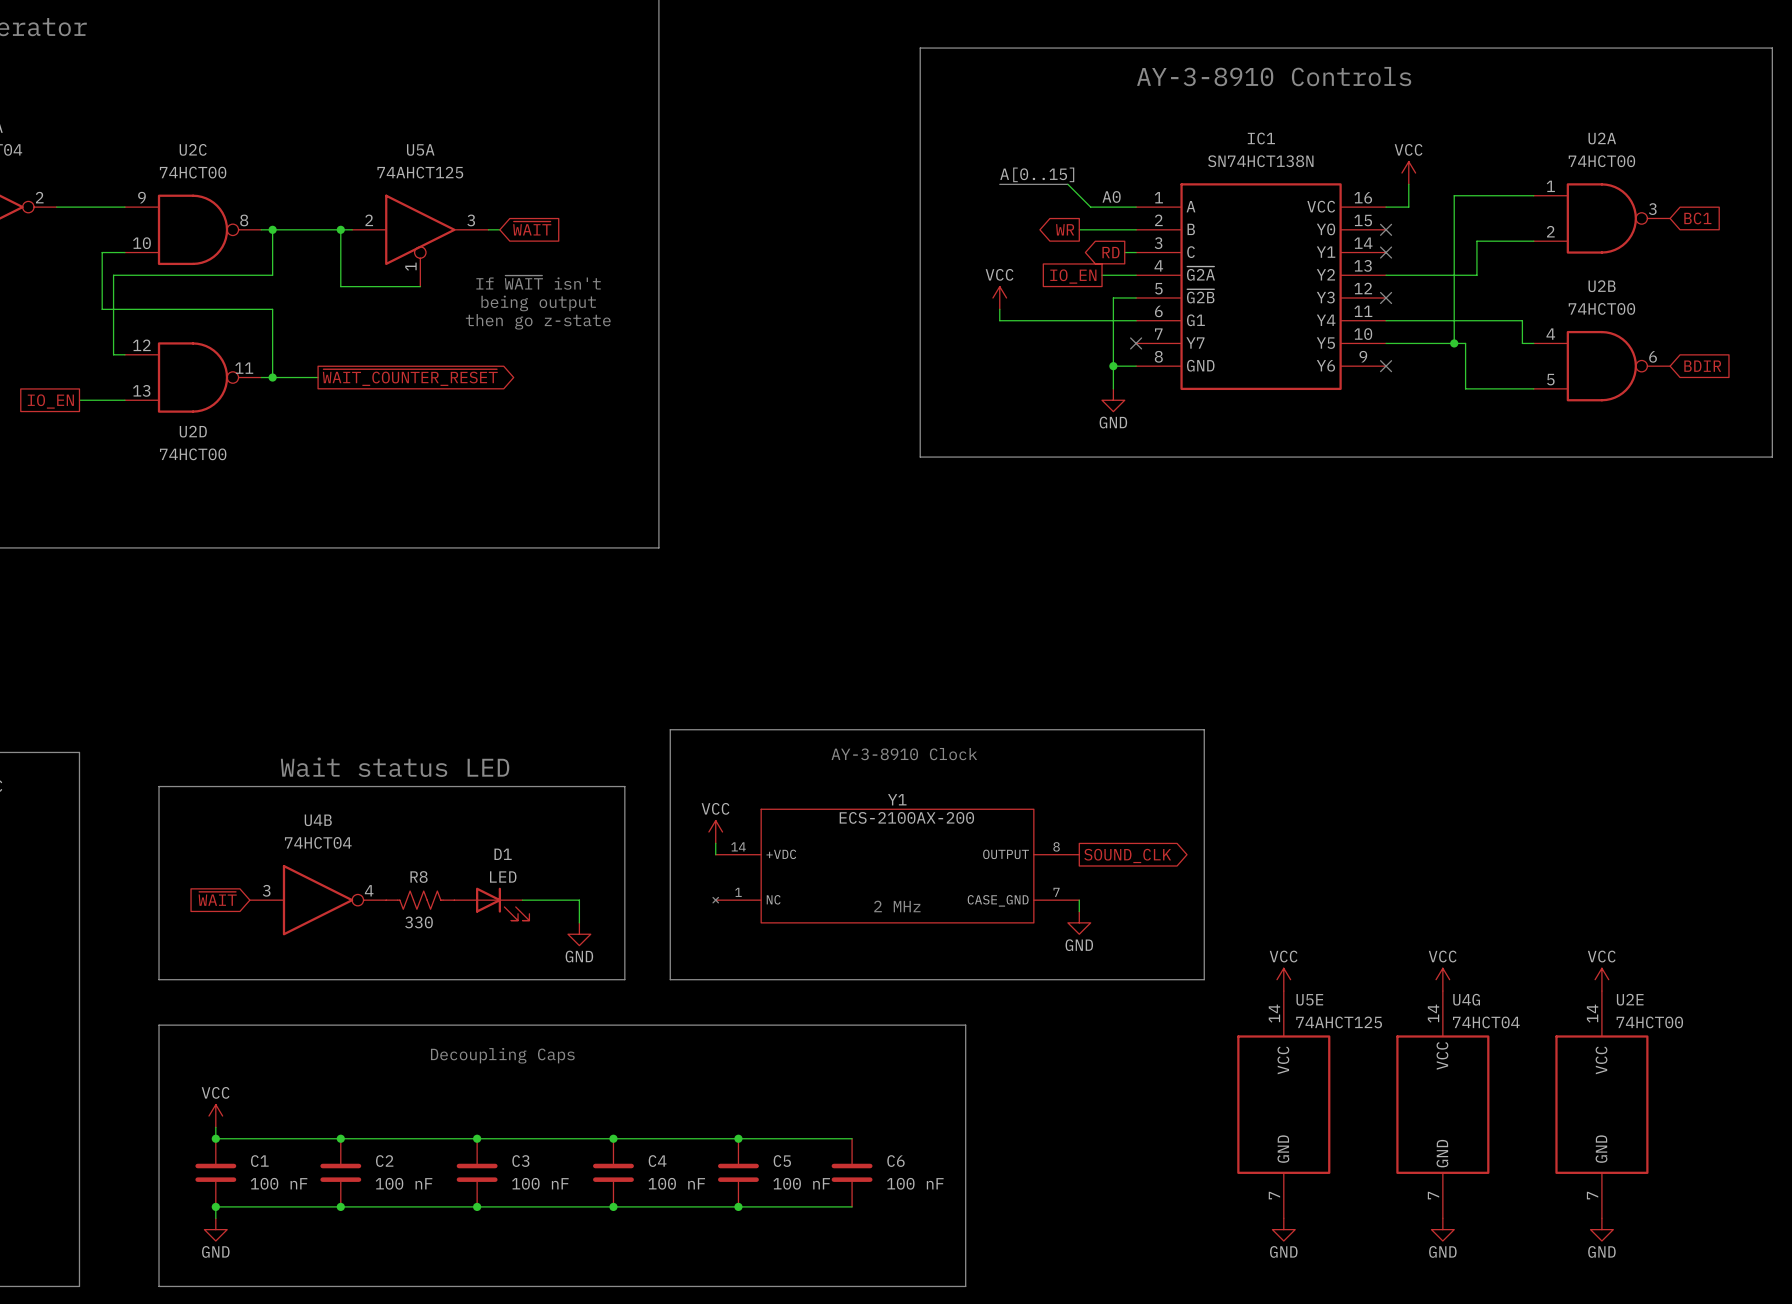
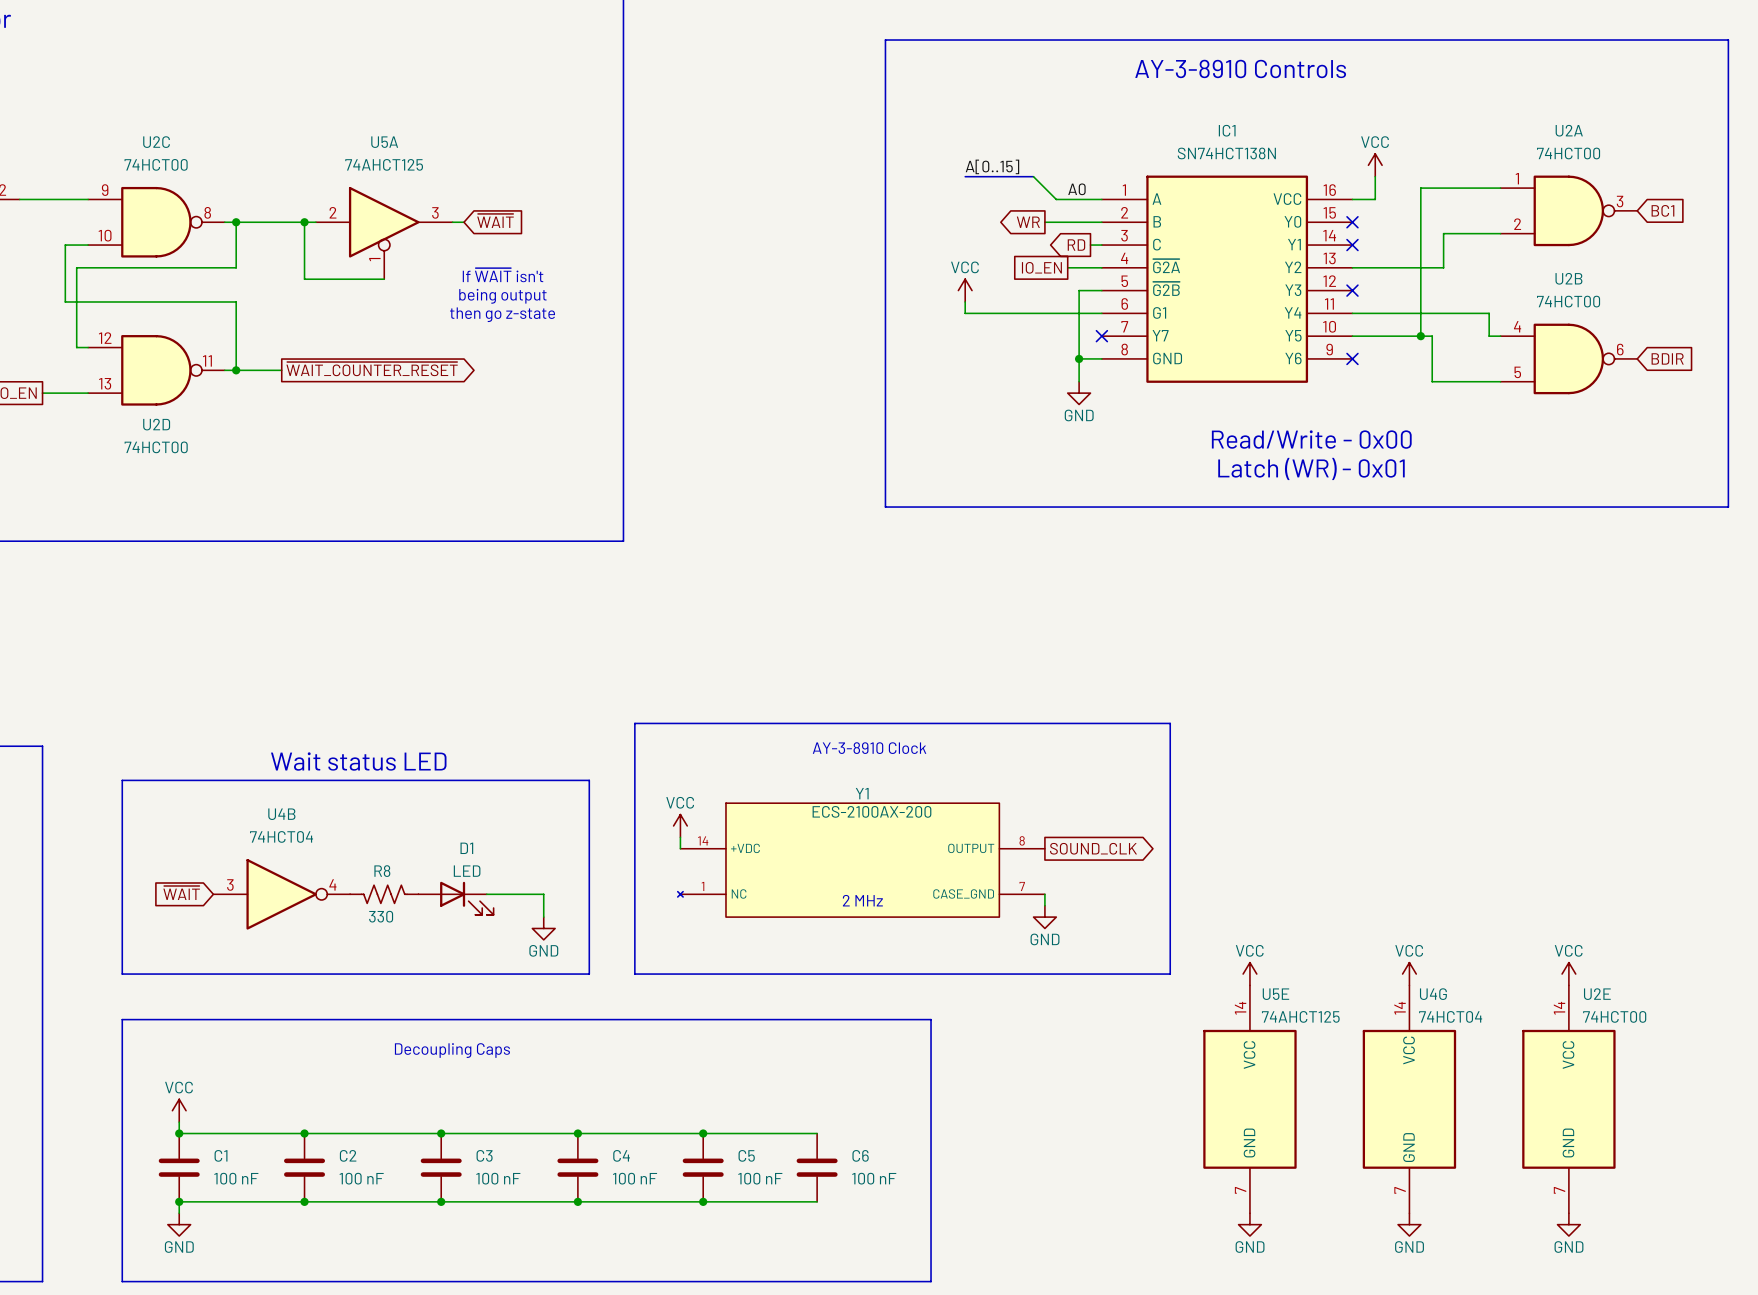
line: (1760, 48) (1772, 48) (1772, 457) (920, 457) -> (1728, 40) (1728, 507) (885, 507) (885, 450)
text: none -> Read/Write - 0x00 (1311, 439)
text: none -> Latch (WR) - 0x01 (1311, 468)

